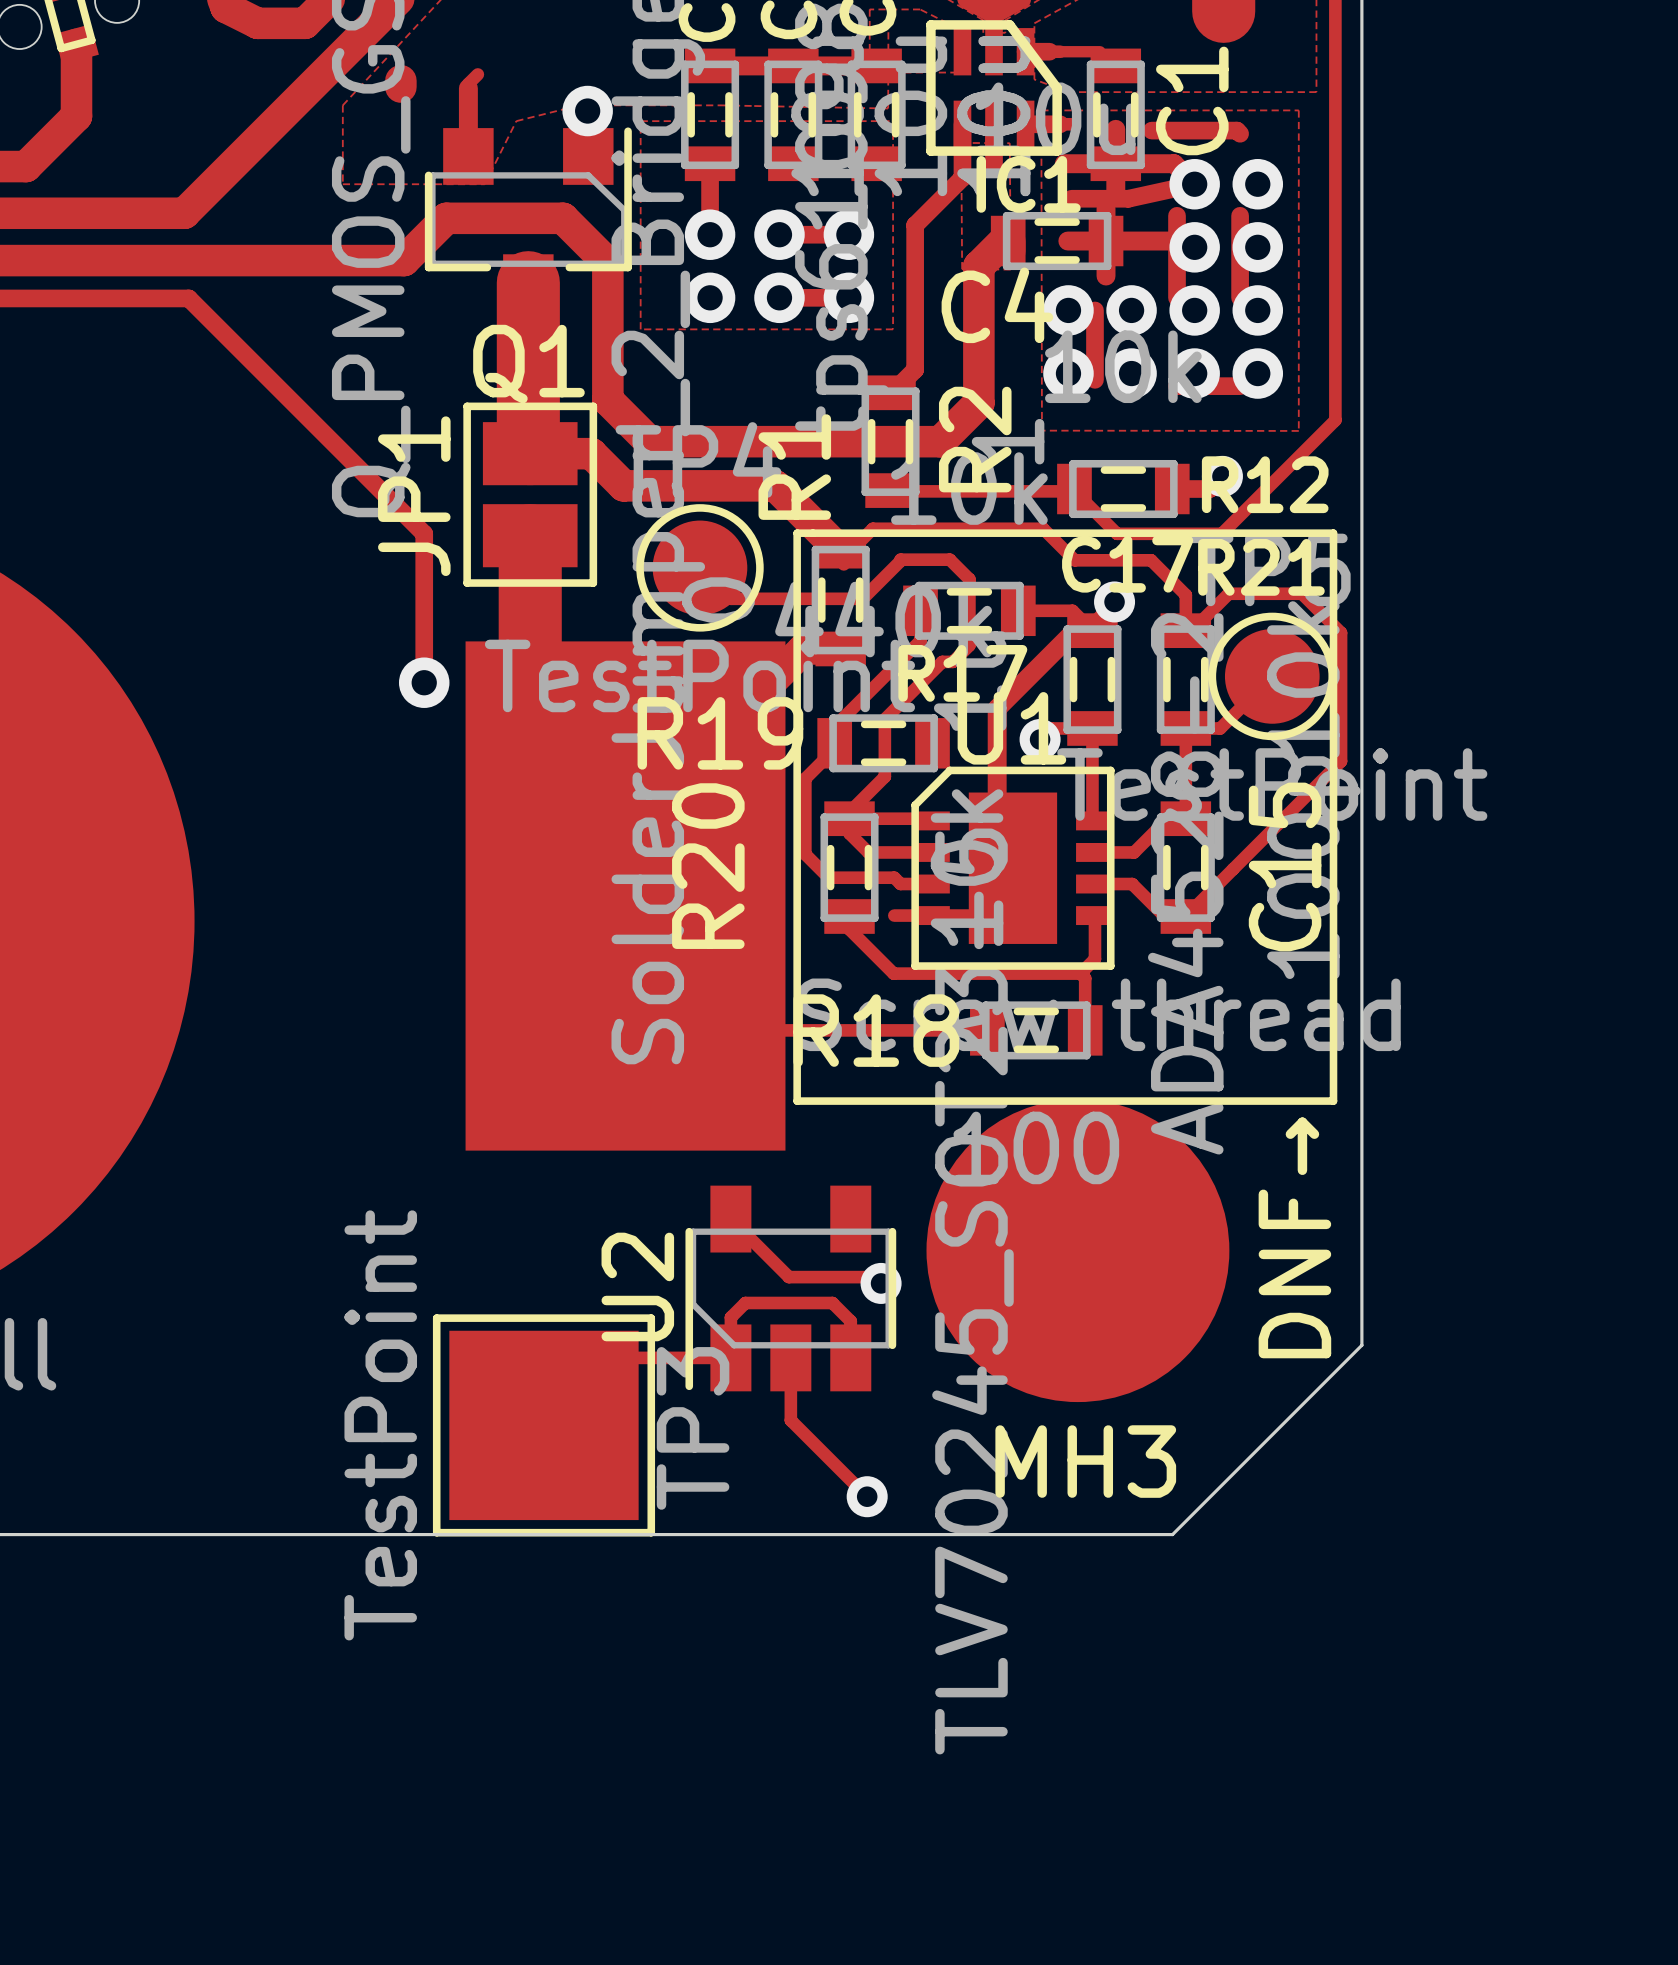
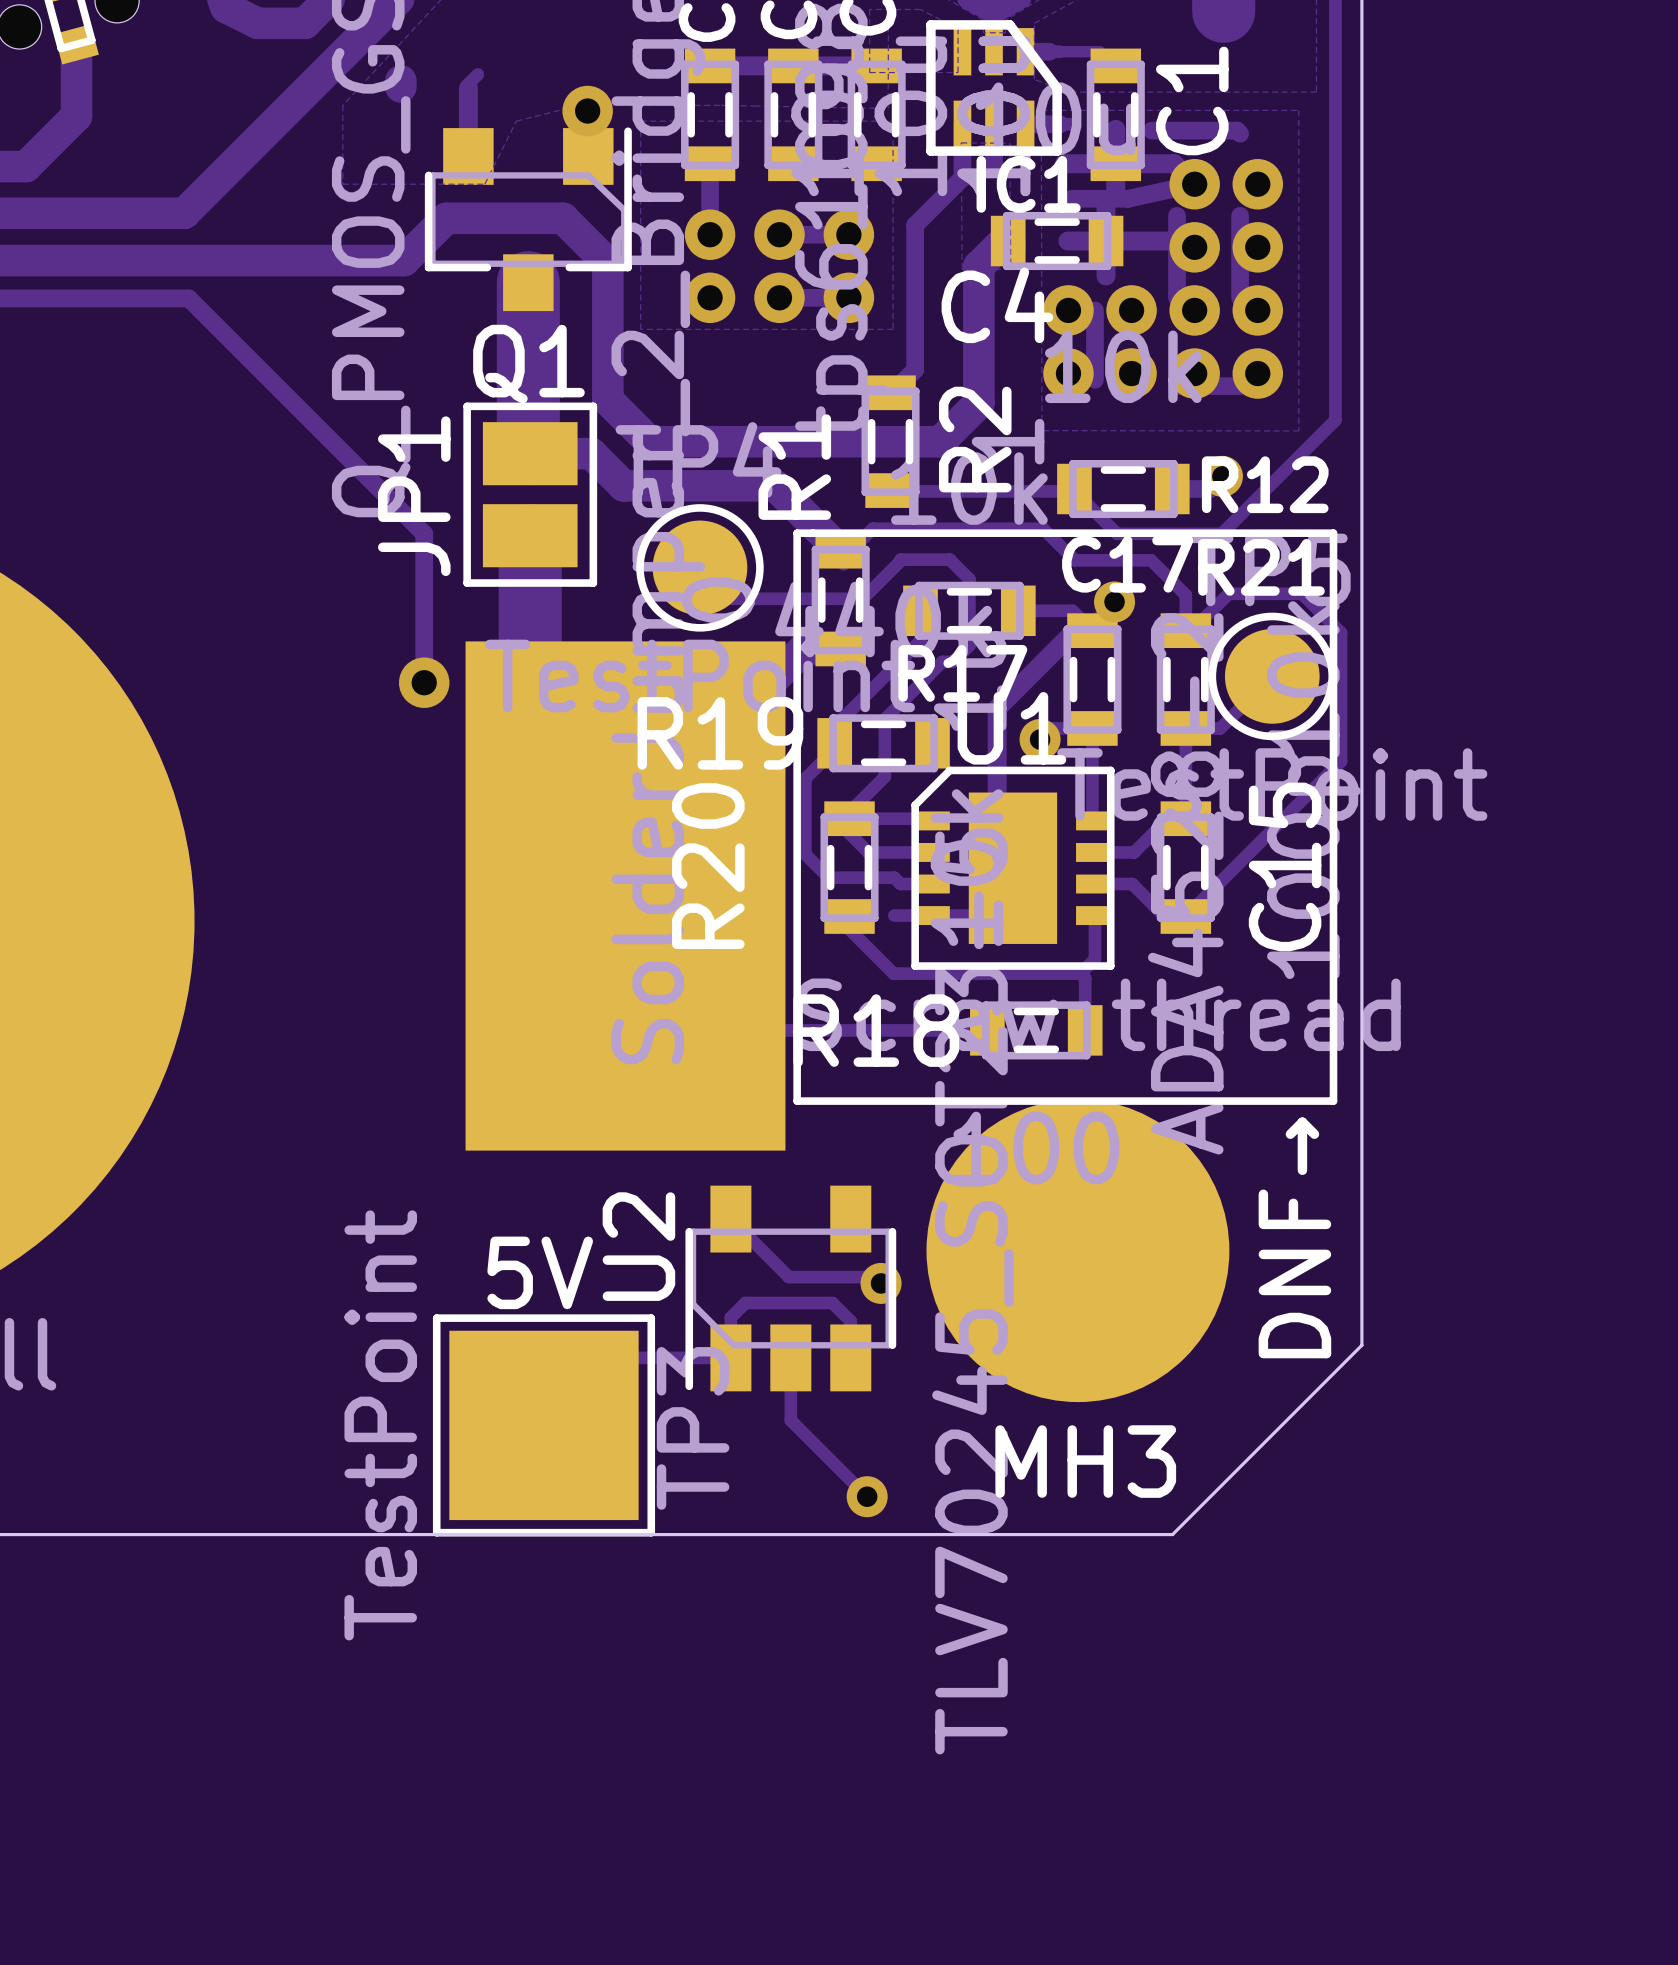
text: none -> 5V (540, 1272)
U2 name position: U2 (637, 1286) -> U2 (638, 1246)

